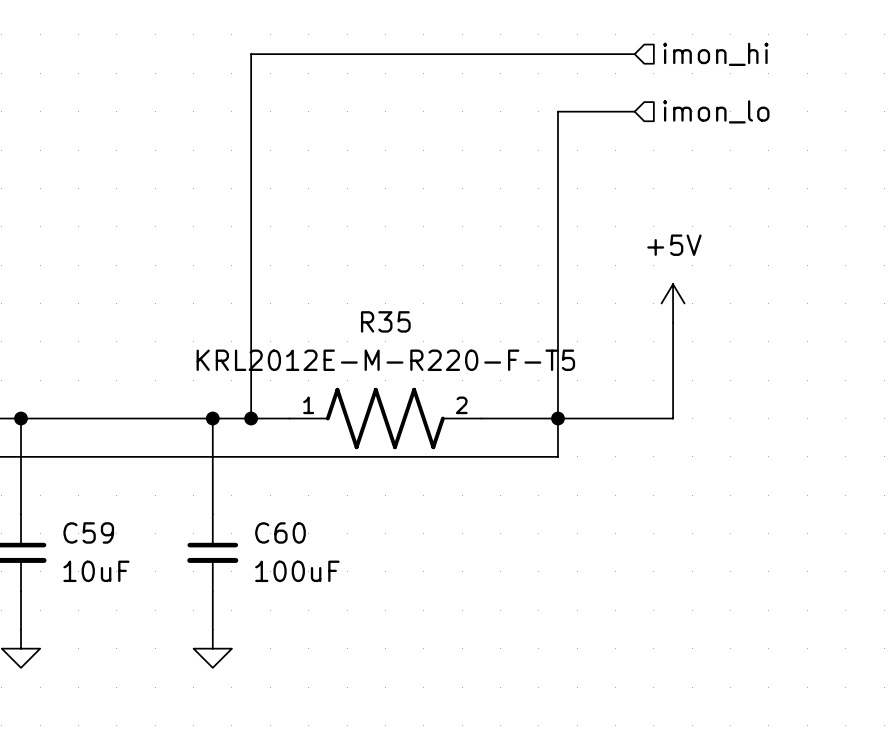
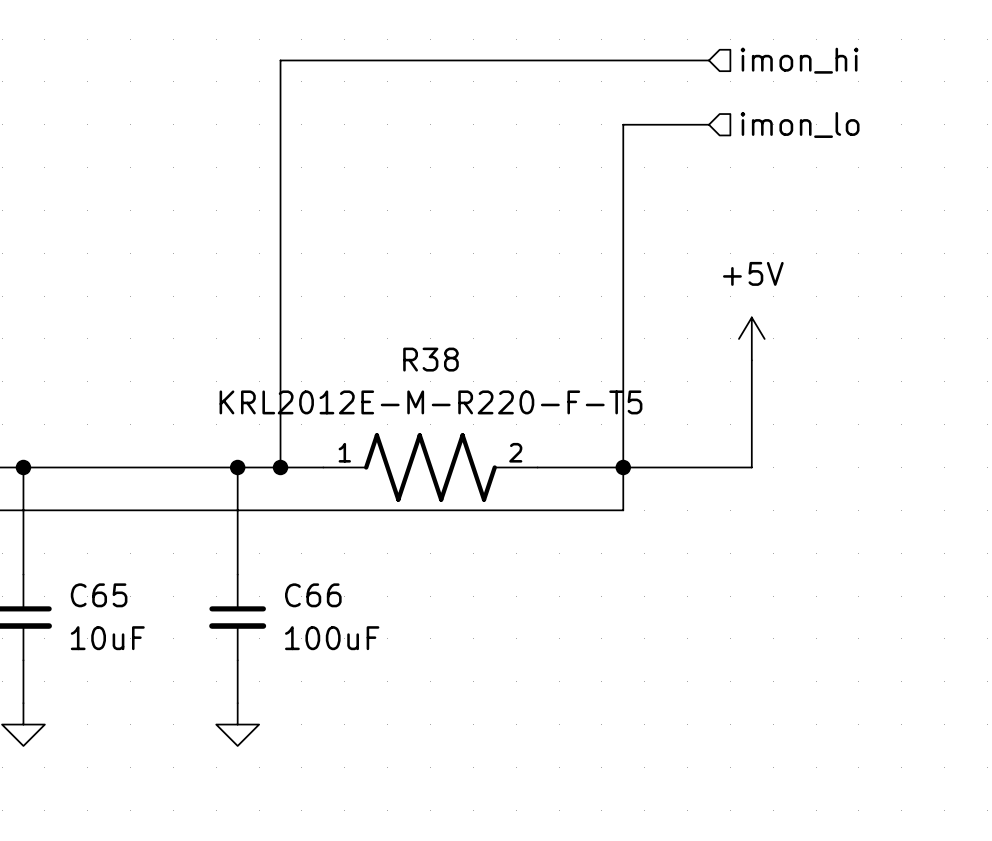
R35 name: R35 (385, 321) -> R38 (430, 359)
C59 name: C59 (88, 532) -> C65 (99, 595)
C60 name: C60 (280, 532) -> C66 (313, 595)

